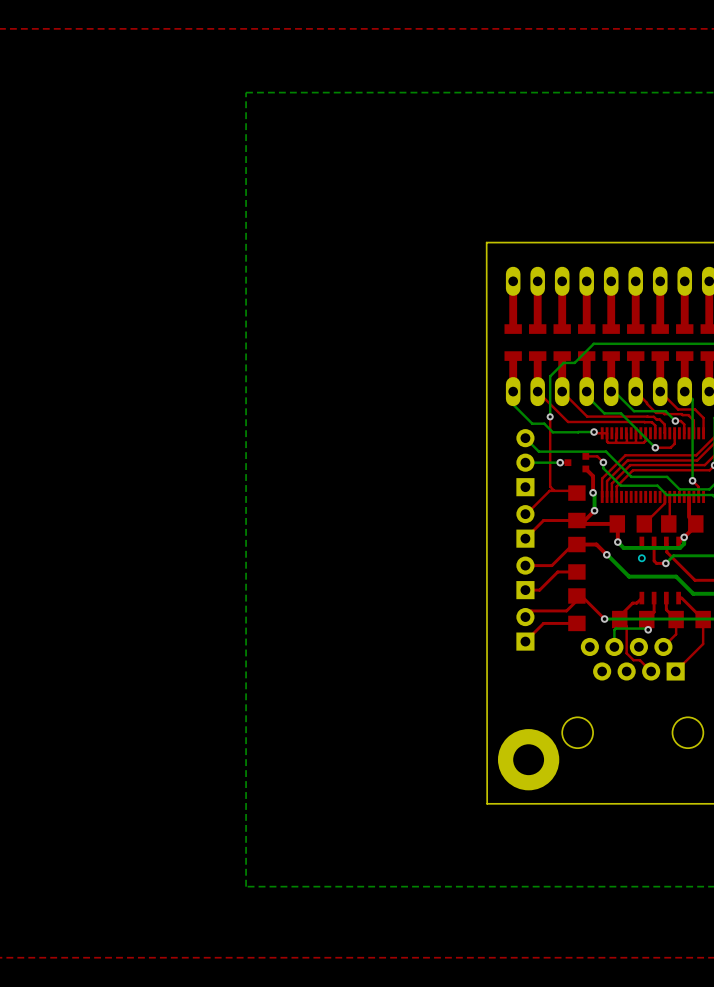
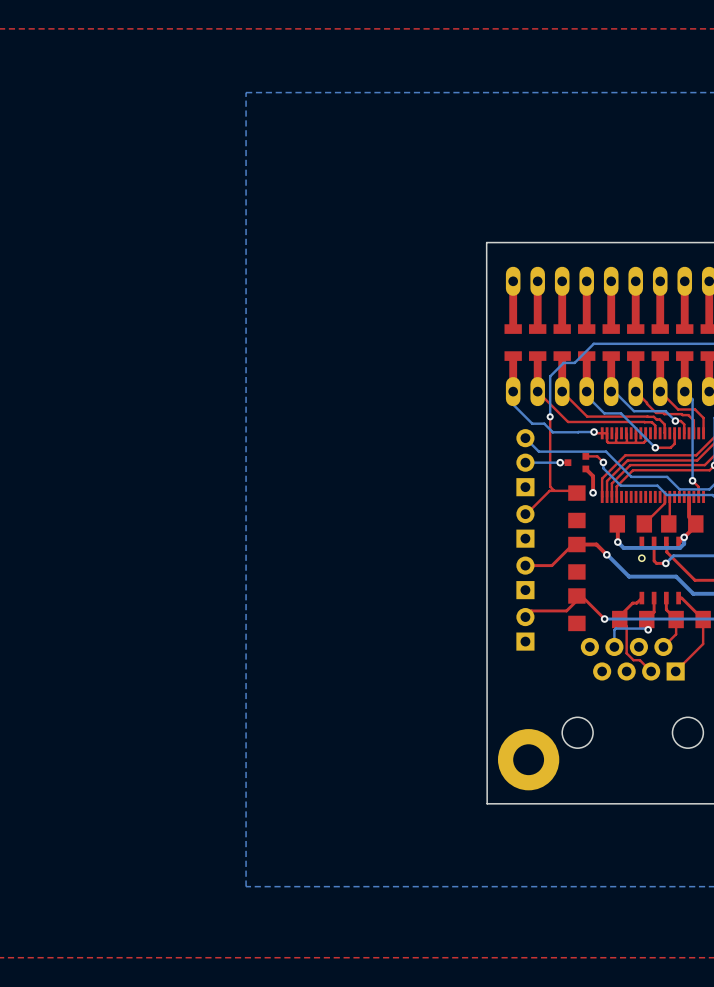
bottom track: (594, 494) (594, 510) -> none
top track: (594, 510) (584, 520) (576, 520) -> none
via: (594, 510) -> none
top track: (576, 520) (543, 520) (525, 538) -> none
top track: (576, 520) (580, 523) (617, 523) -> none
top track: (576, 571) (557, 571) (539, 590) (525, 590) -> none
top track: (576, 623) (543, 623) (525, 641) -> none

